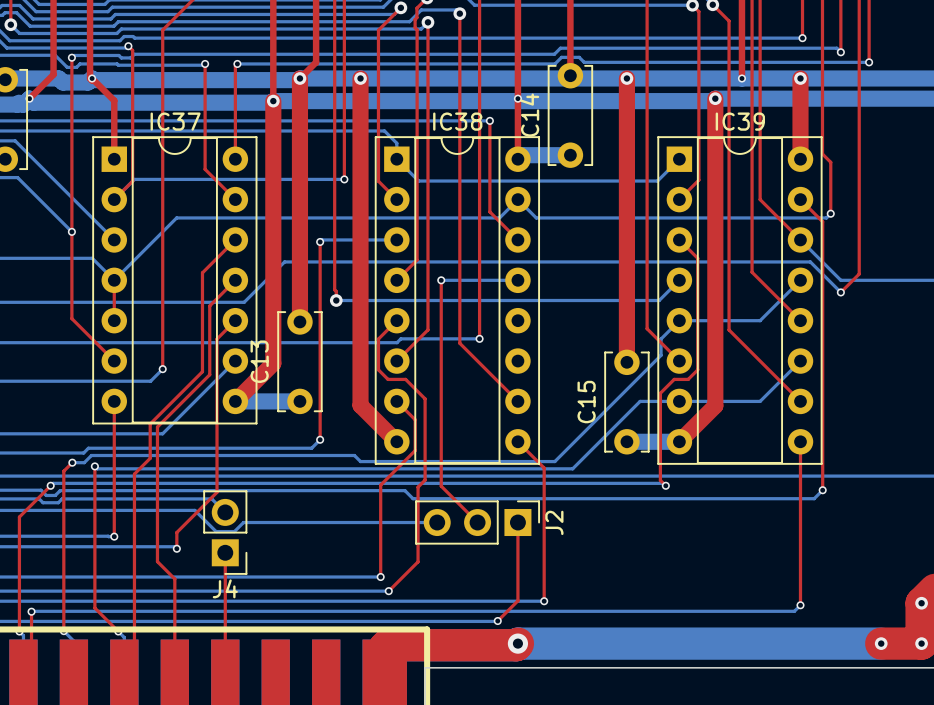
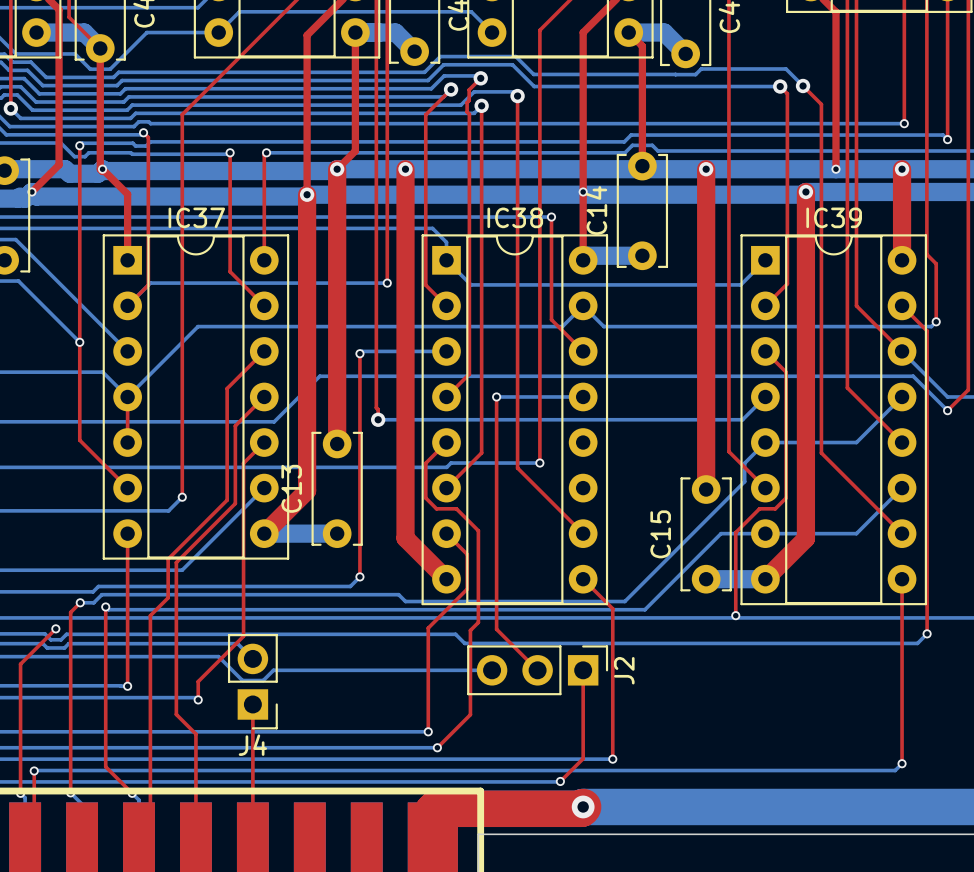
top track: (660, 393) (660, 480) (665, 485) -> (743, 524) (735, 532) (735, 615)
bottom track: (50, 485) (53, 483) (663, 483) (665, 485) -> none
via position: (665, 485) -> (735, 615)

